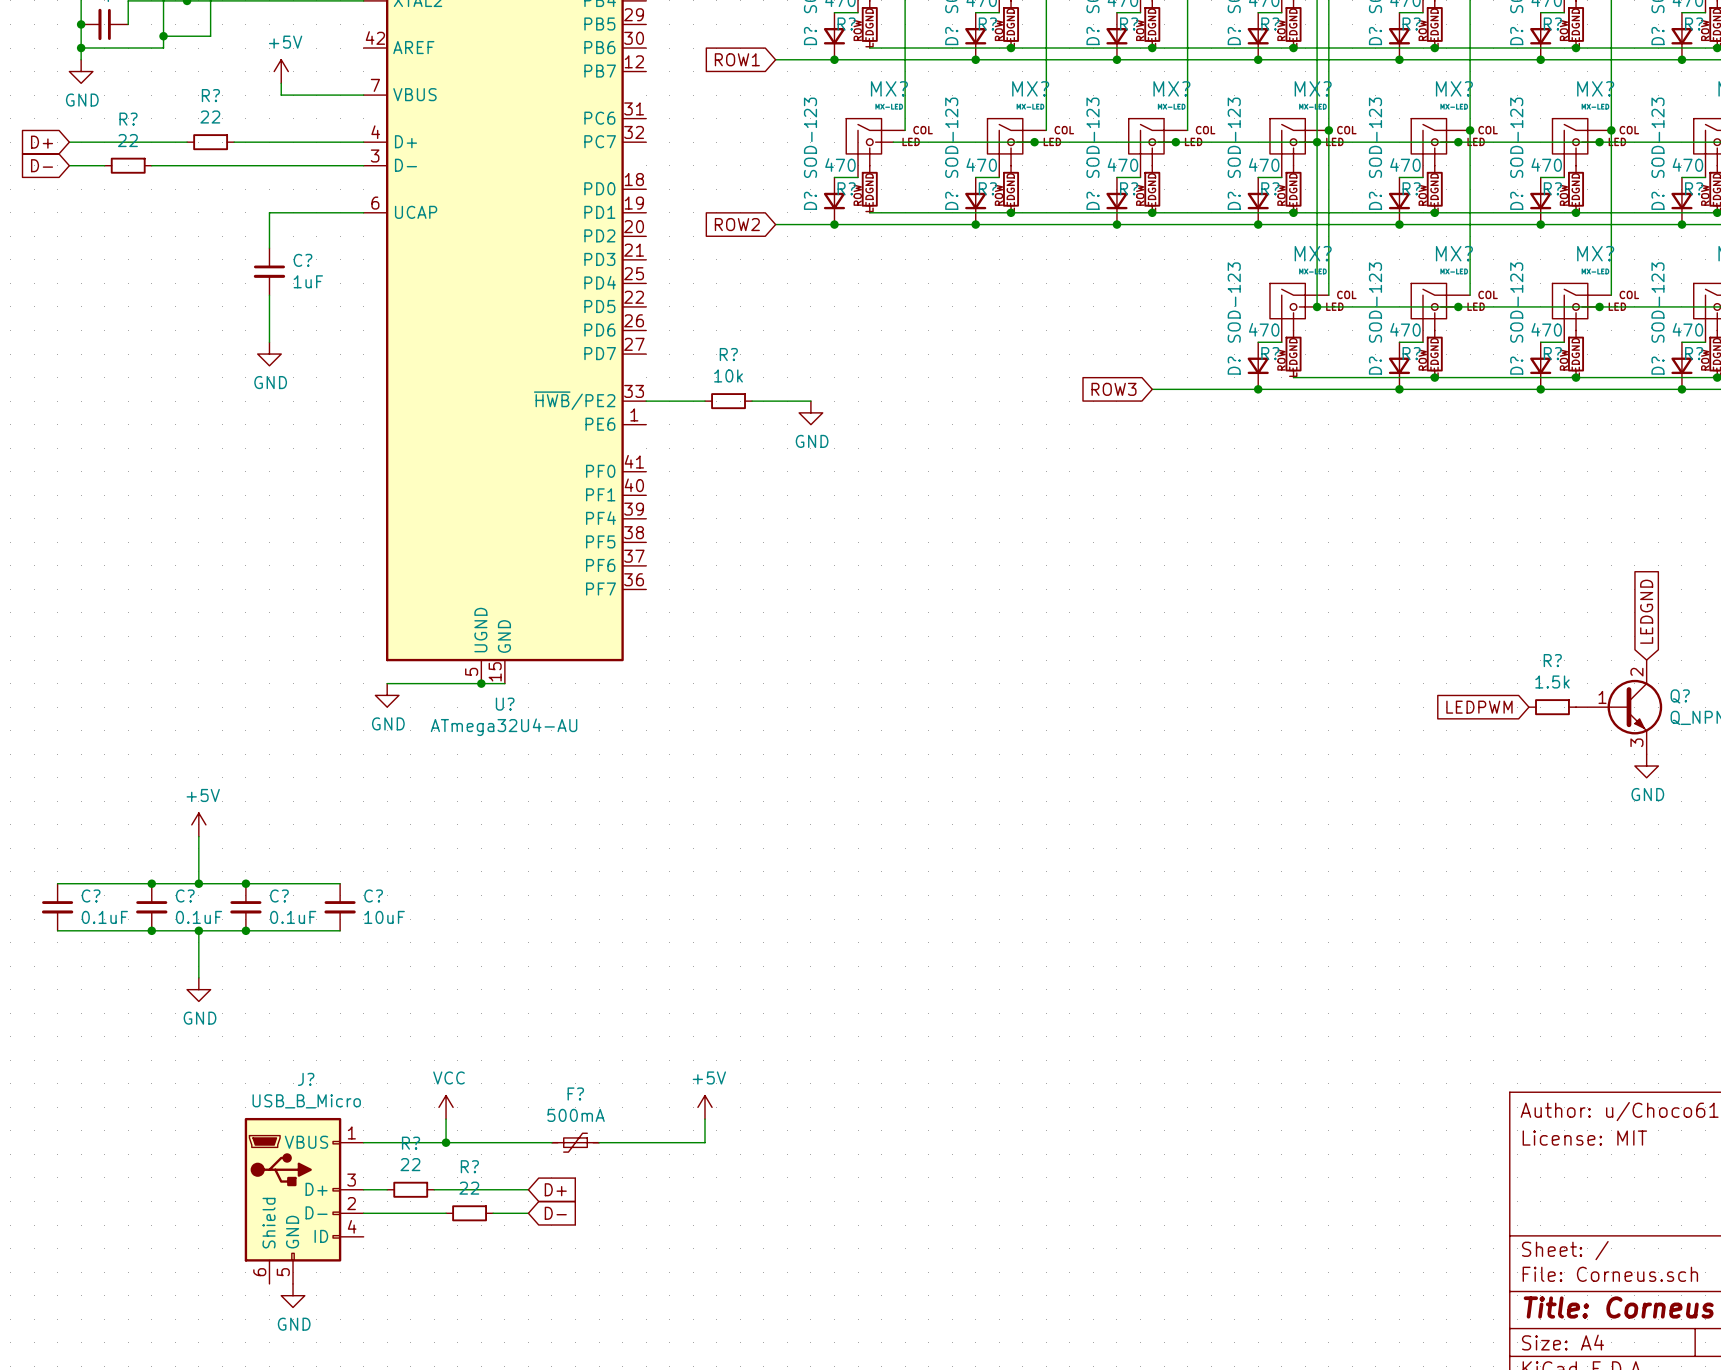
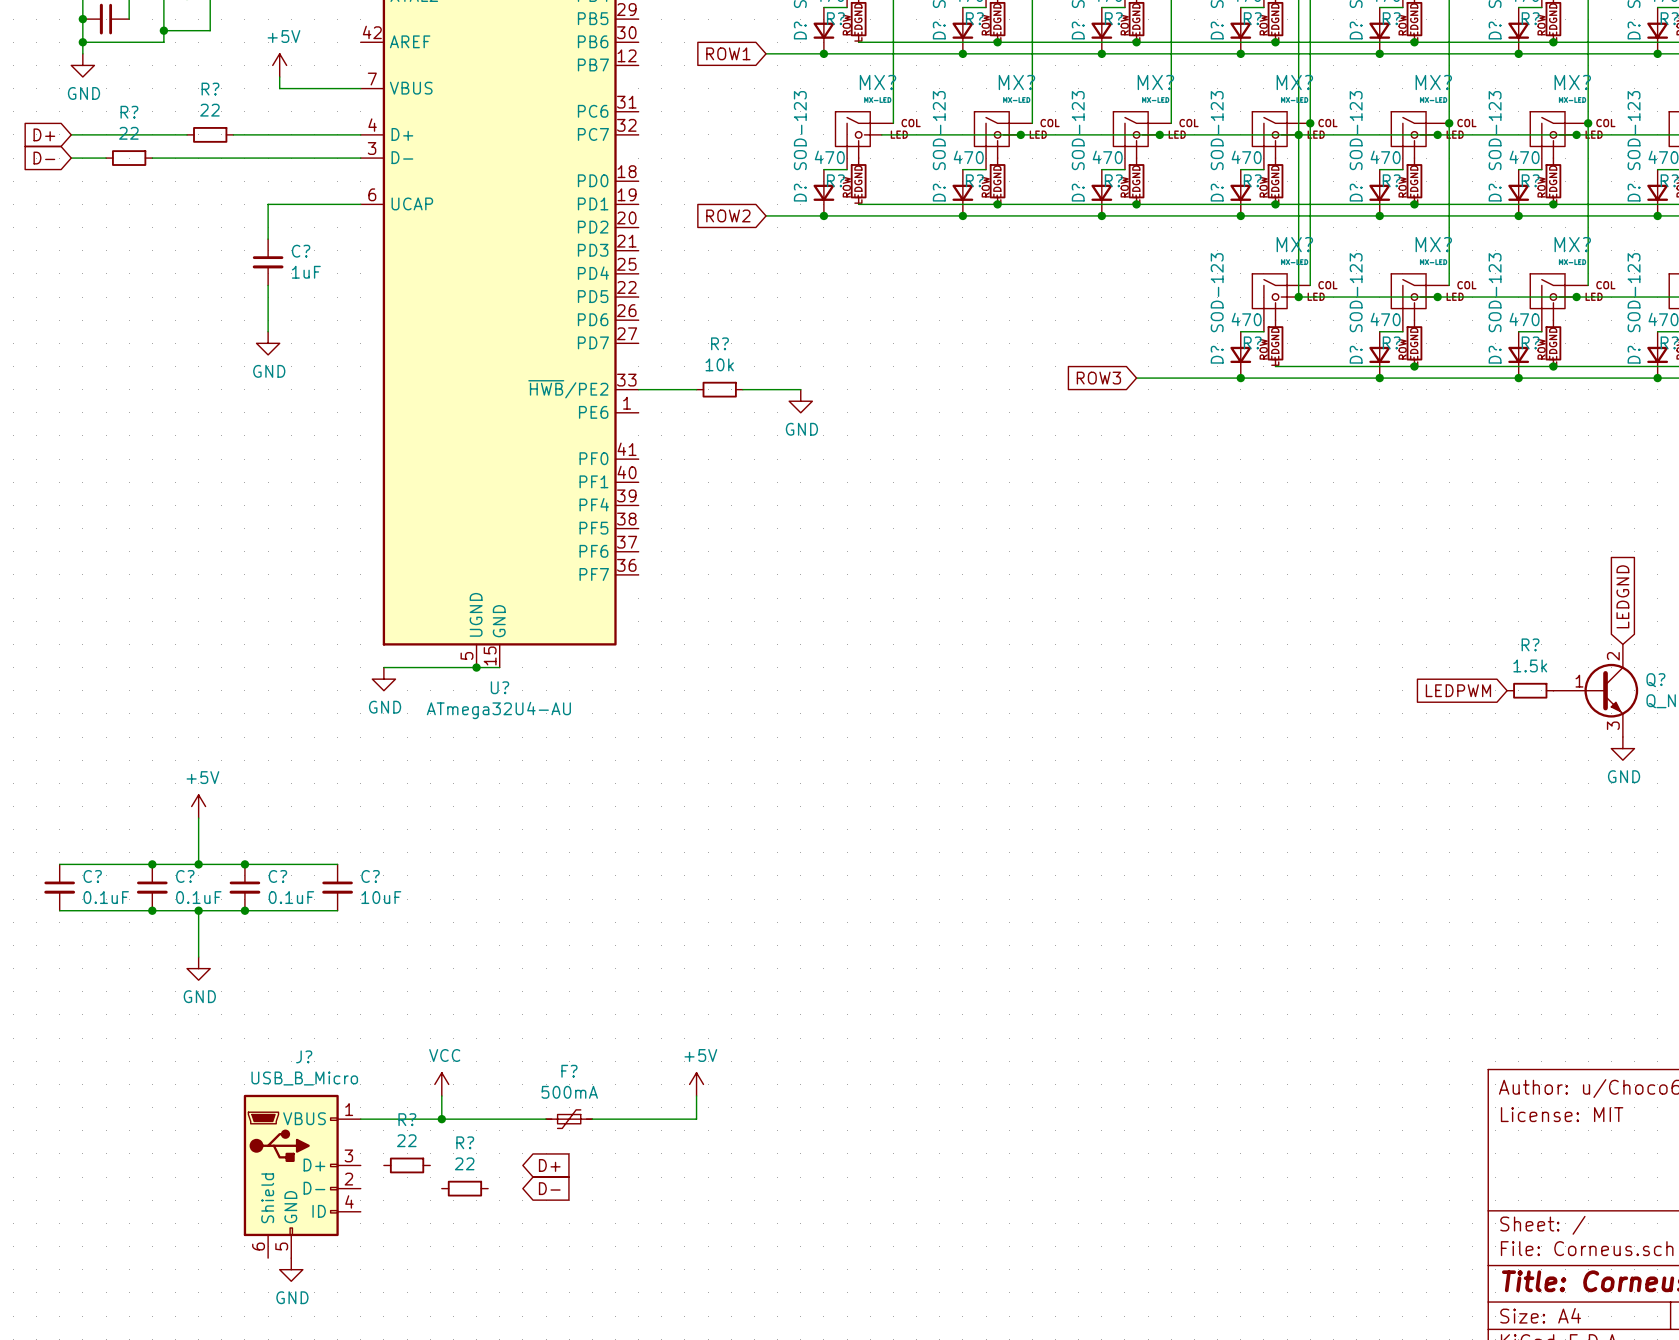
wire: (363, 1189) (387, 1189) -> none
wire: (434, 1189) (528, 1189) -> none
wire: (363, 1213) (446, 1213) -> none
wire: (493, 1213) (528, 1213) -> none

